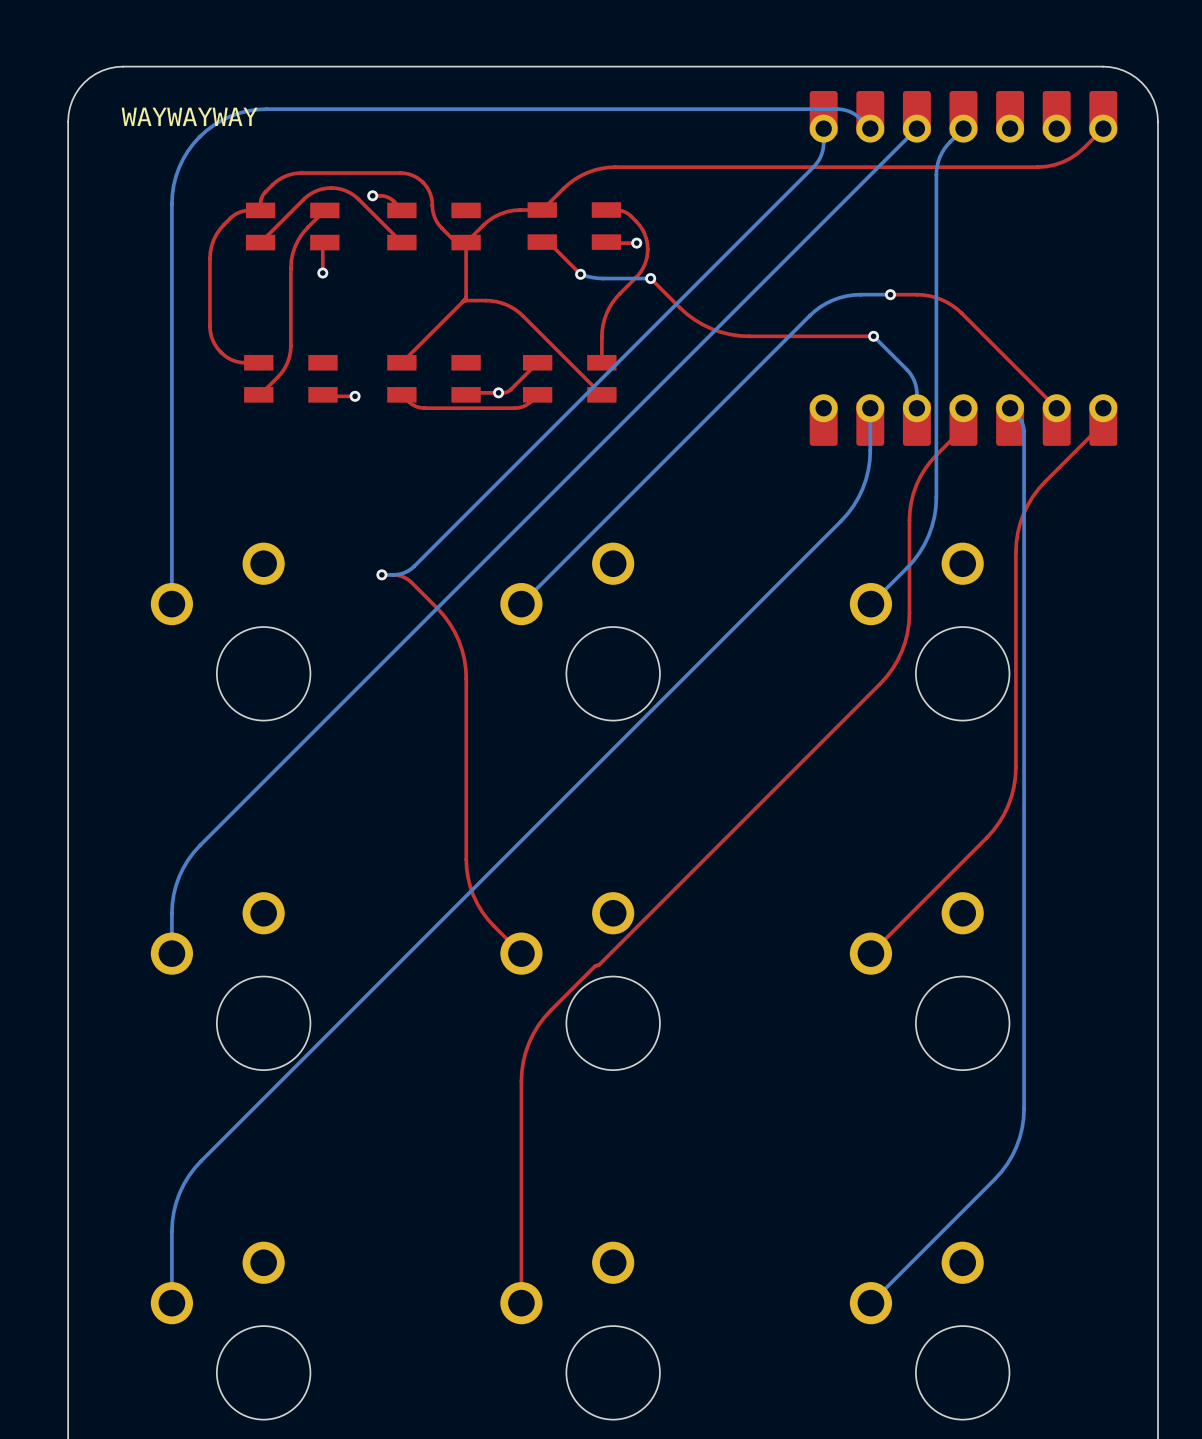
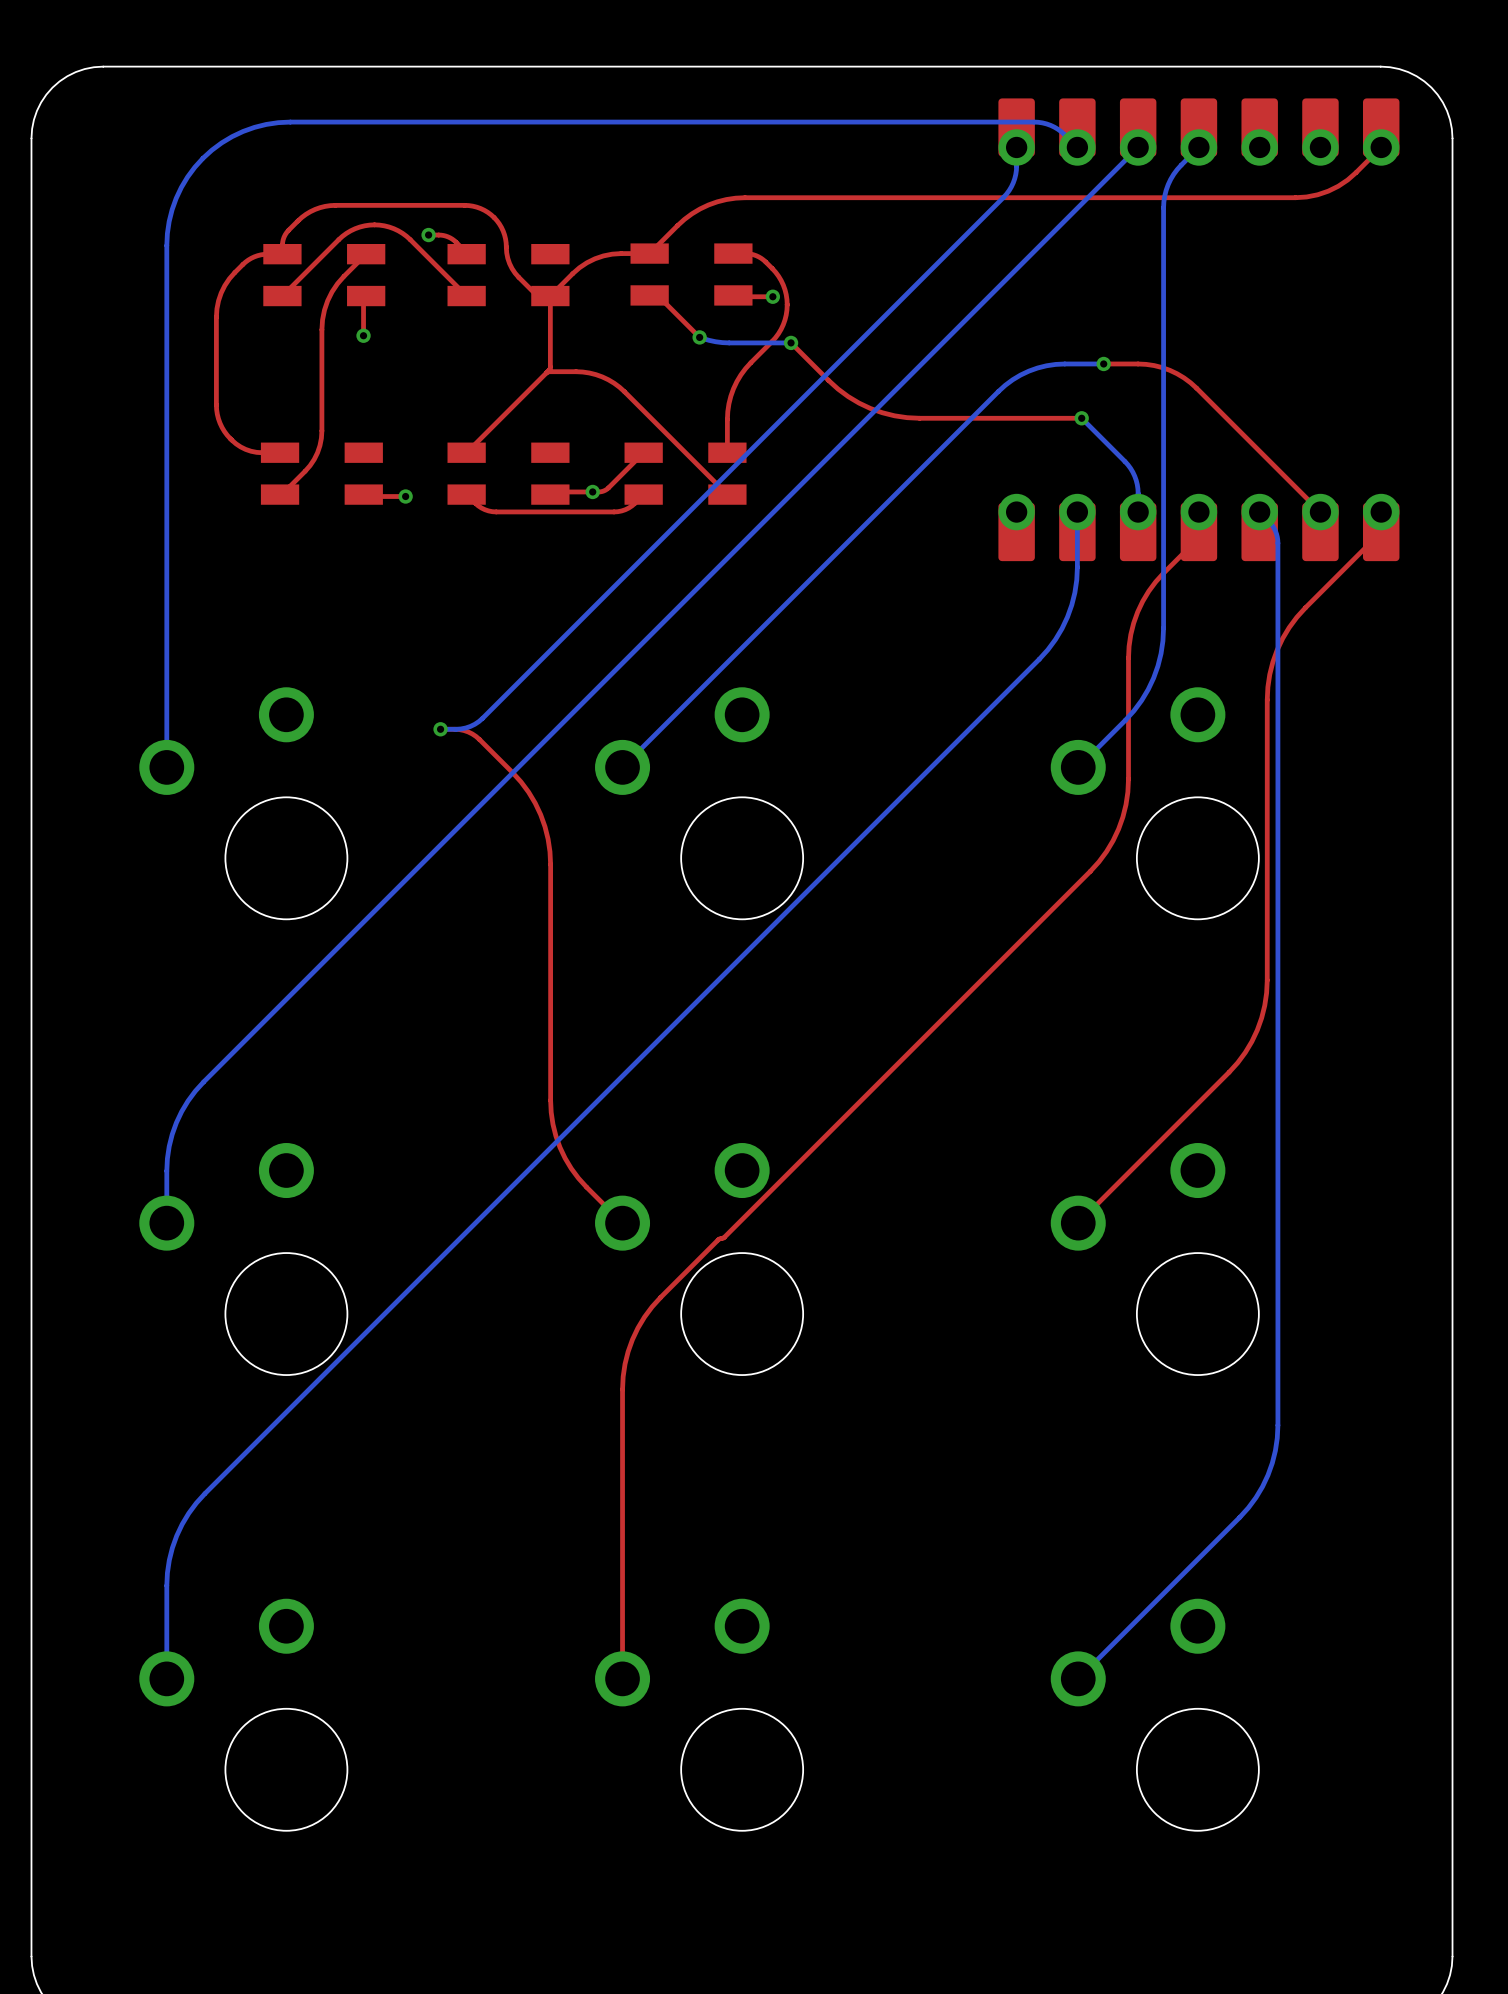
text: WAYWAYWAY (189, 116) -> none

